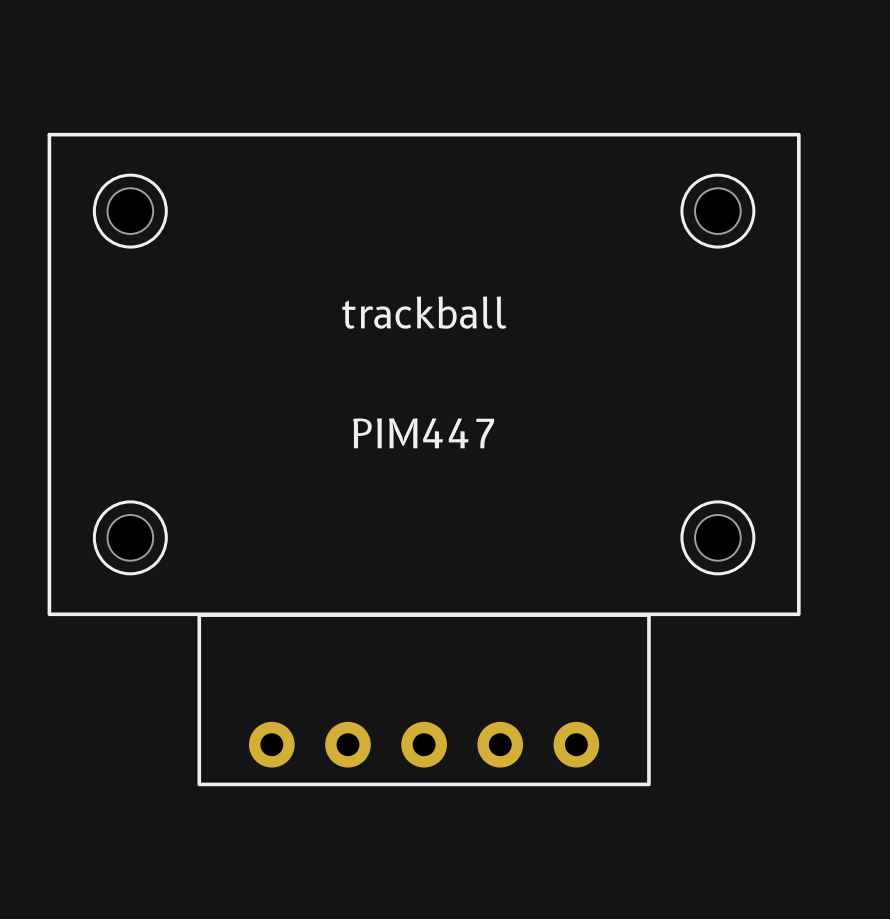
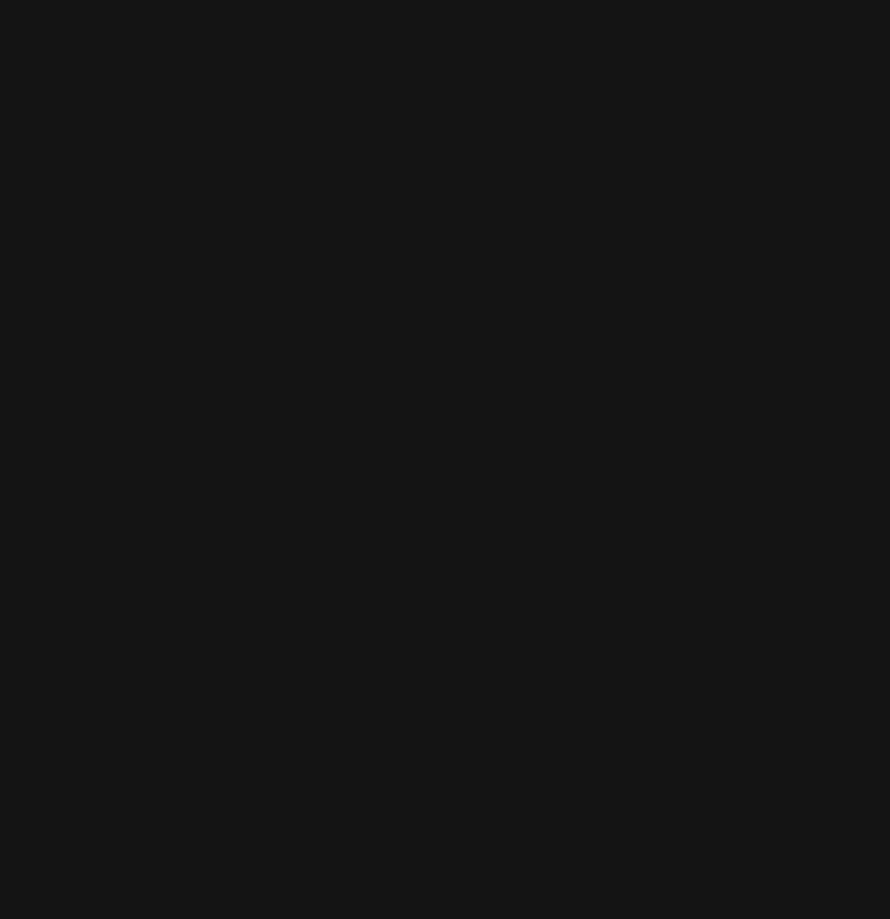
part: PIM447 (424, 459) -> none

